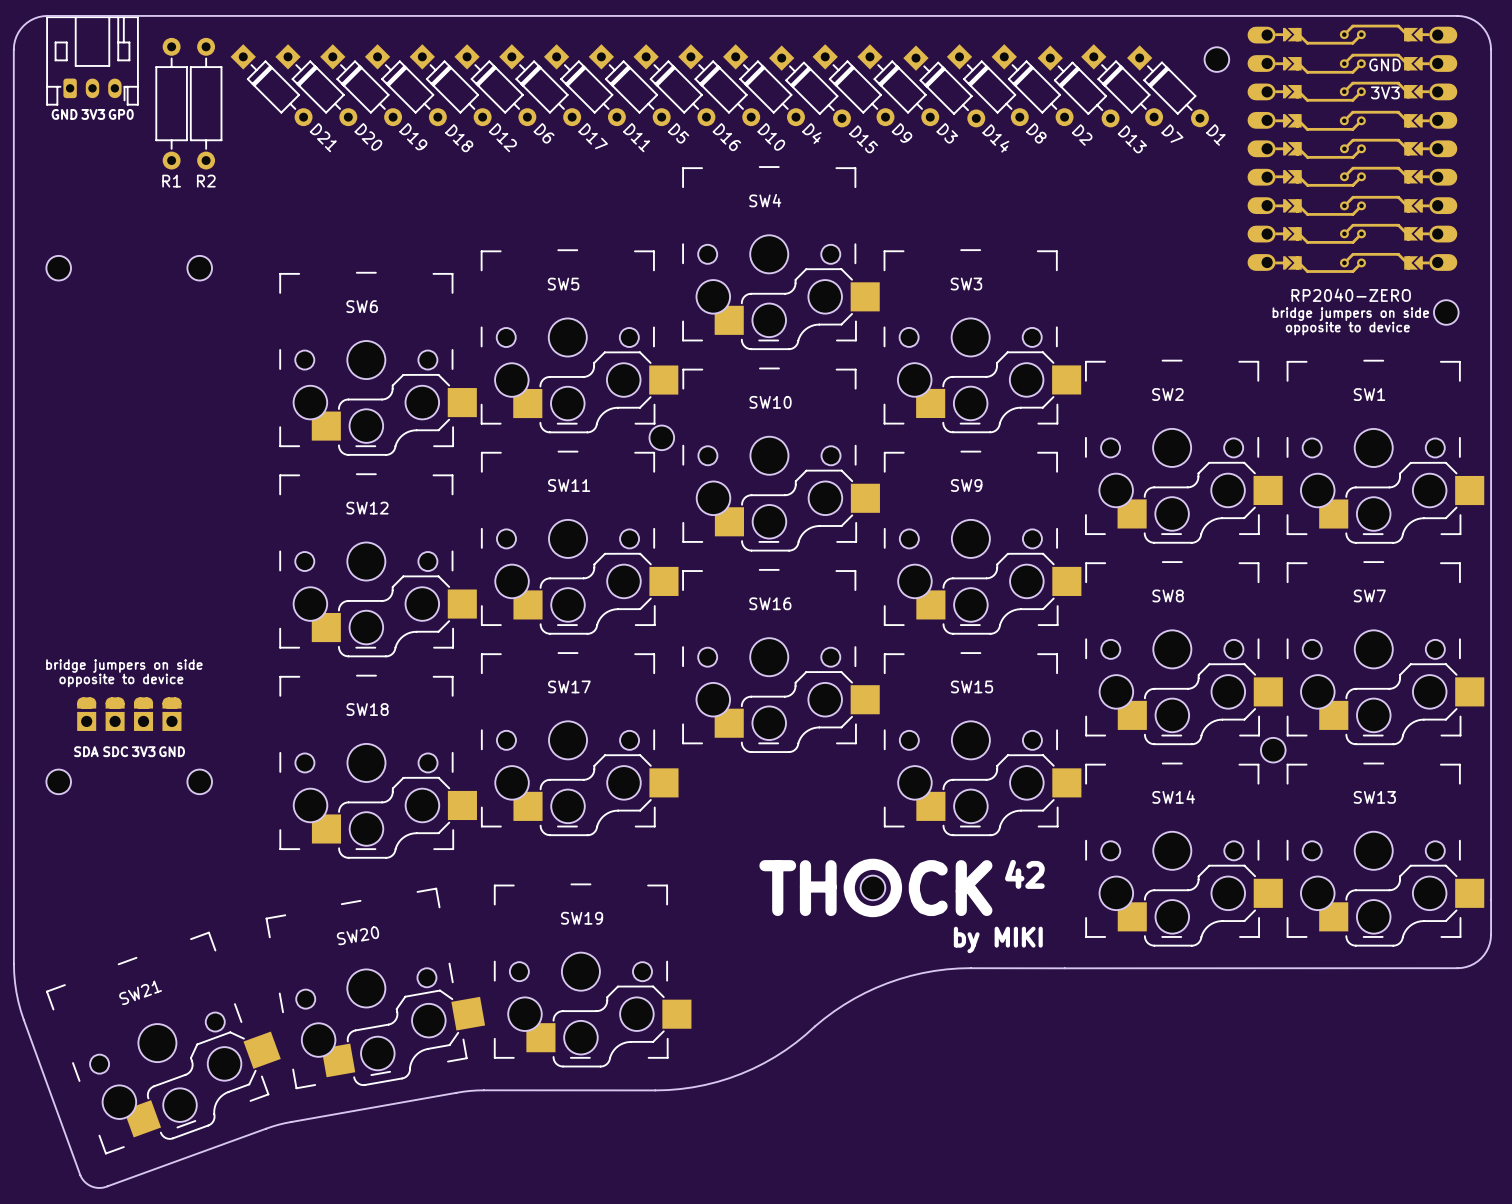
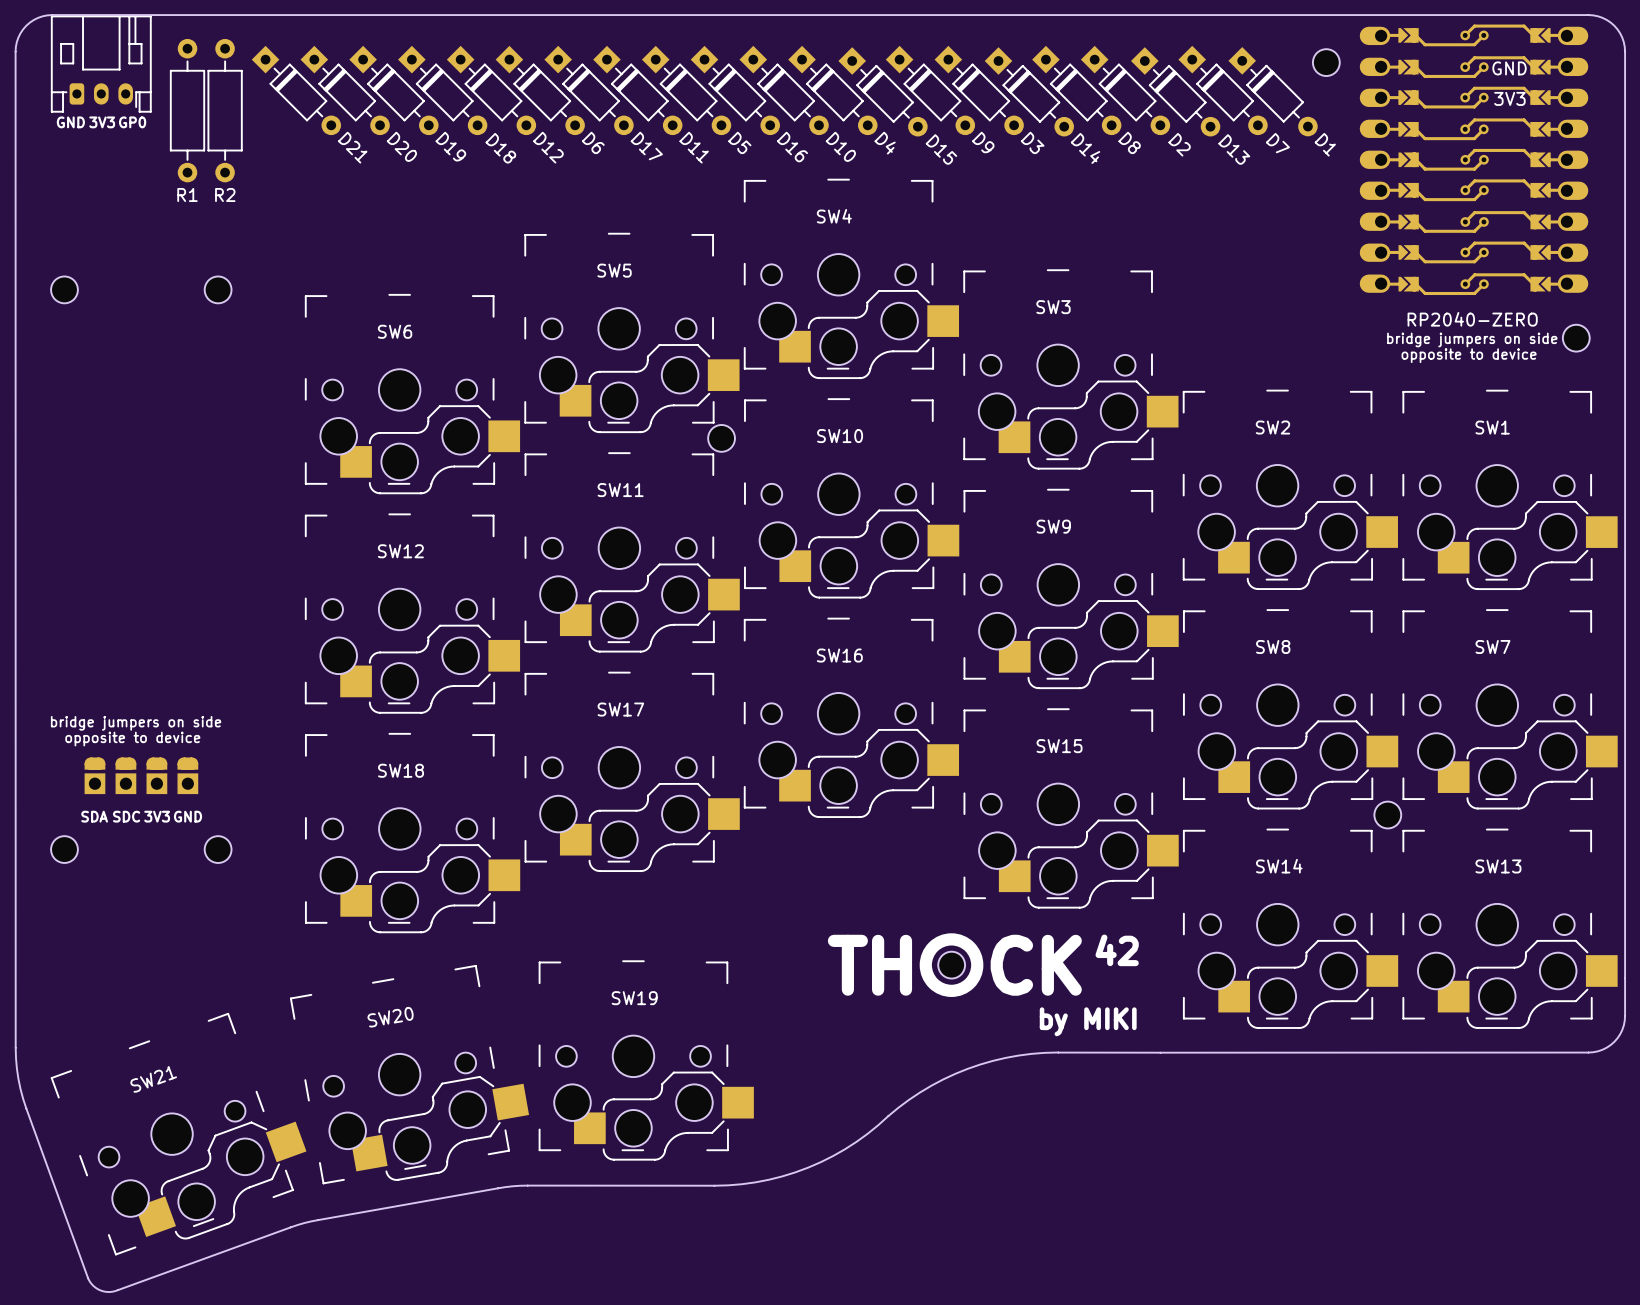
SW5 position: (579, 341) -> (632, 332)
part position: (661, 437) -> (721, 438)
SW11 position: (579, 542) -> (632, 552)
SW17 position: (579, 744) -> (632, 771)

